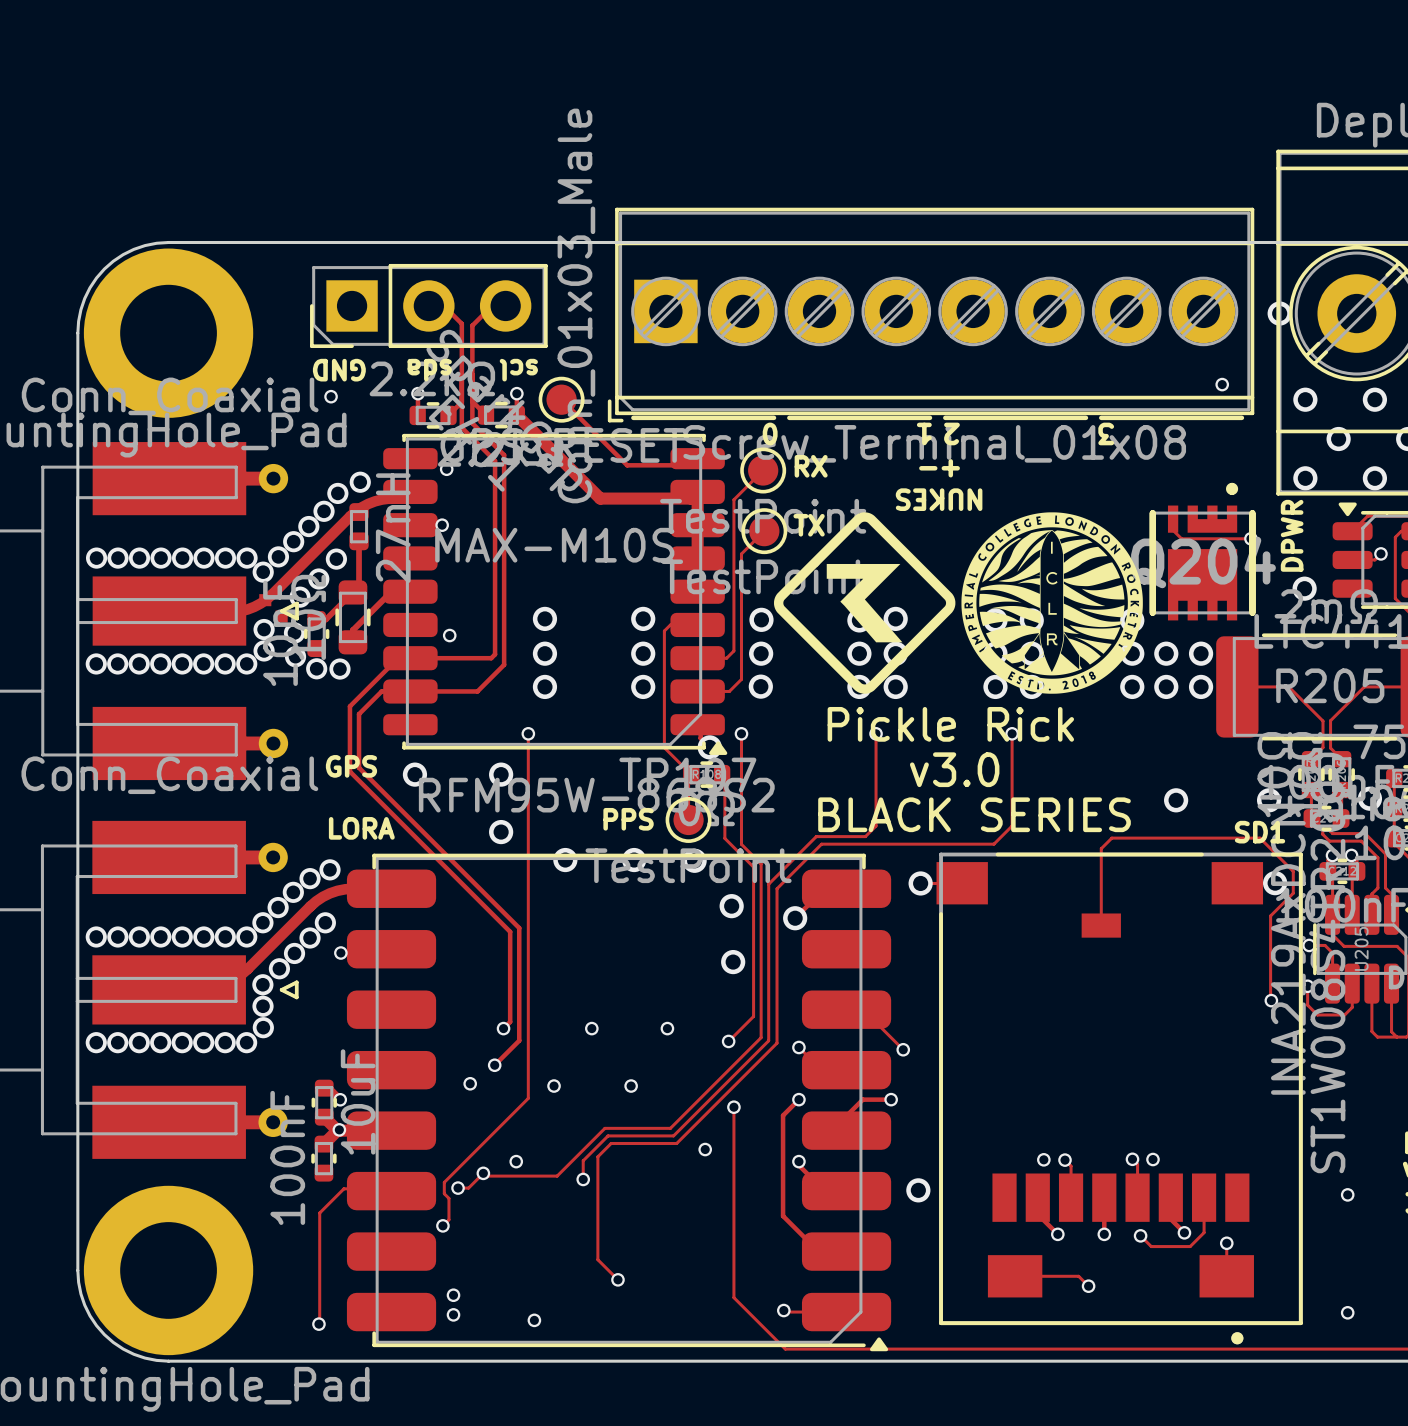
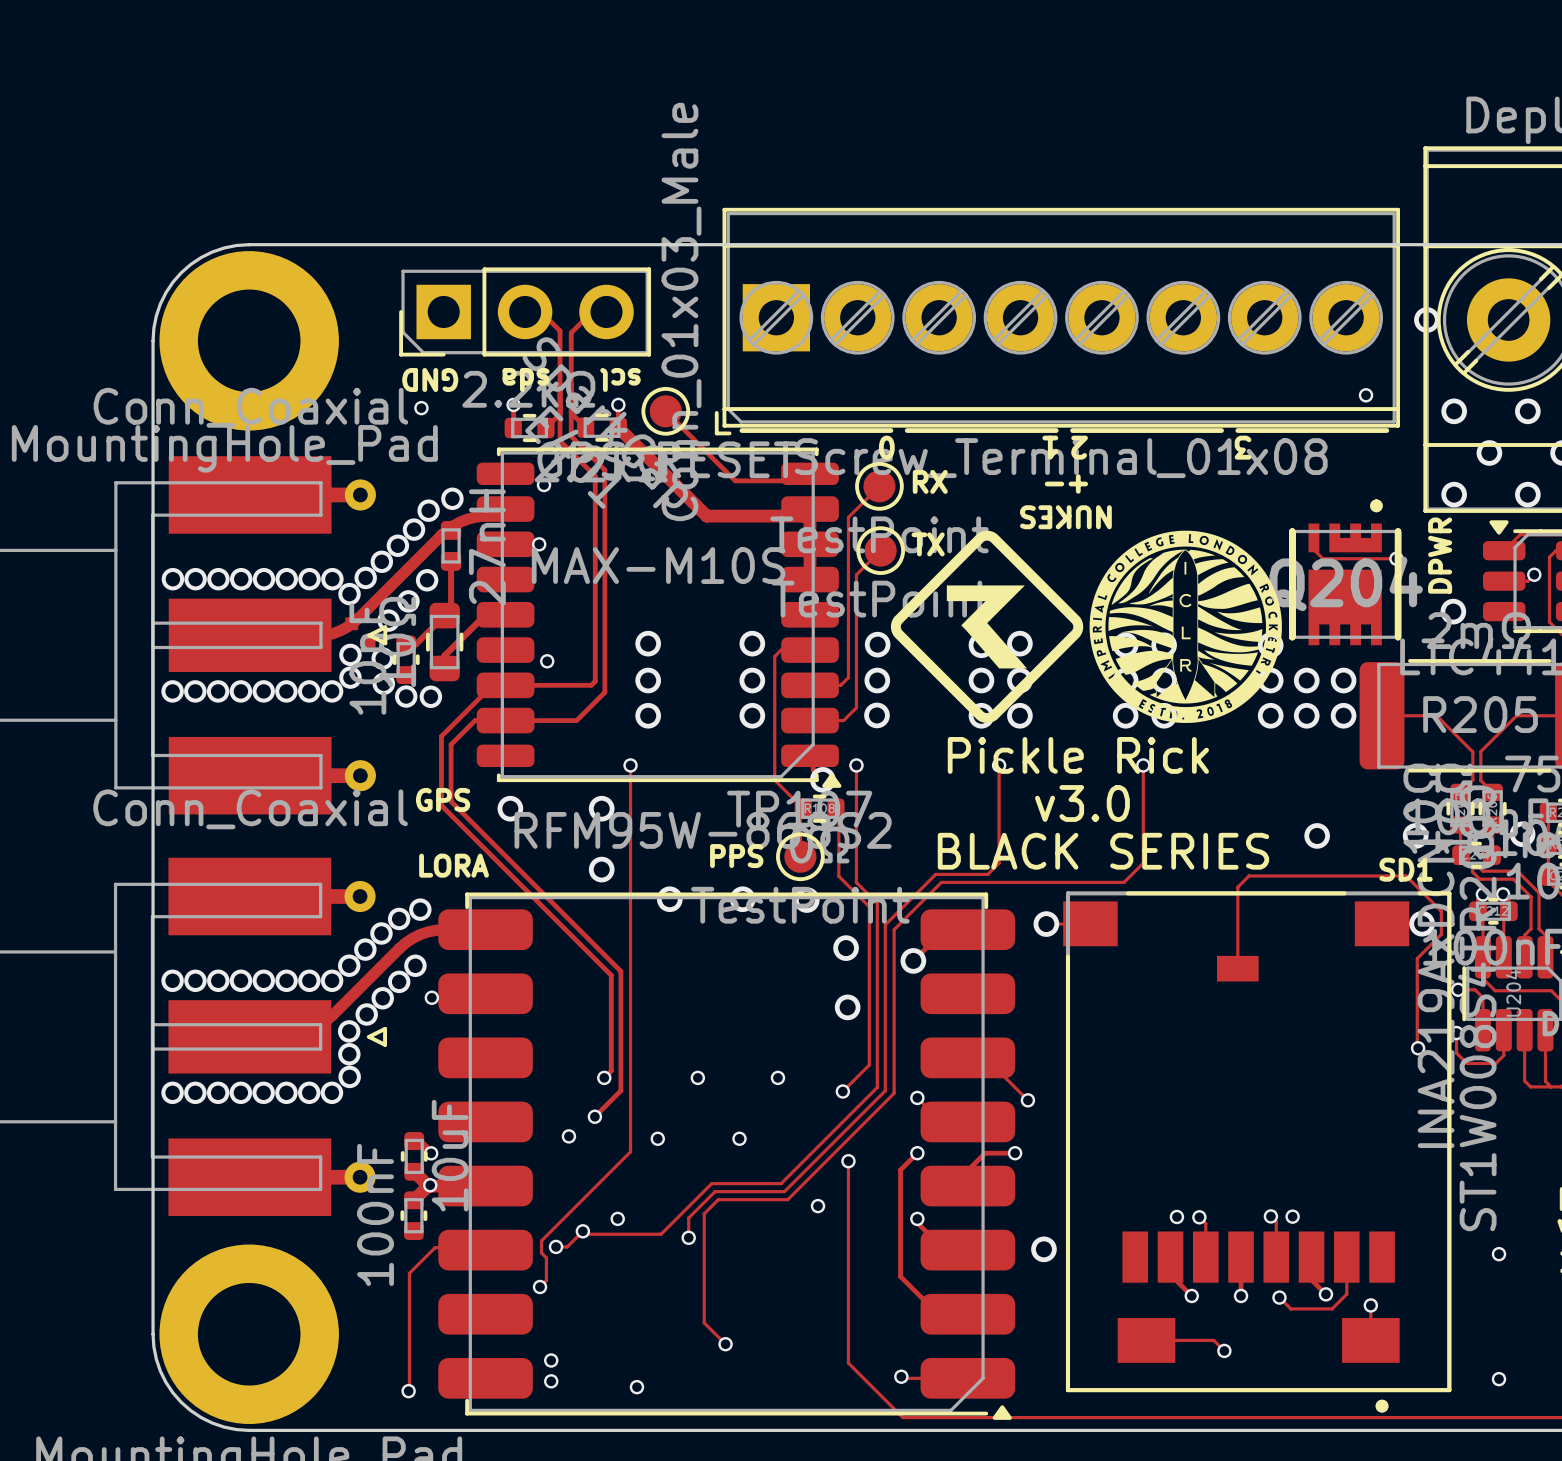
U205 name: U205 (1361, 948) -> U204 (1513, 993)

